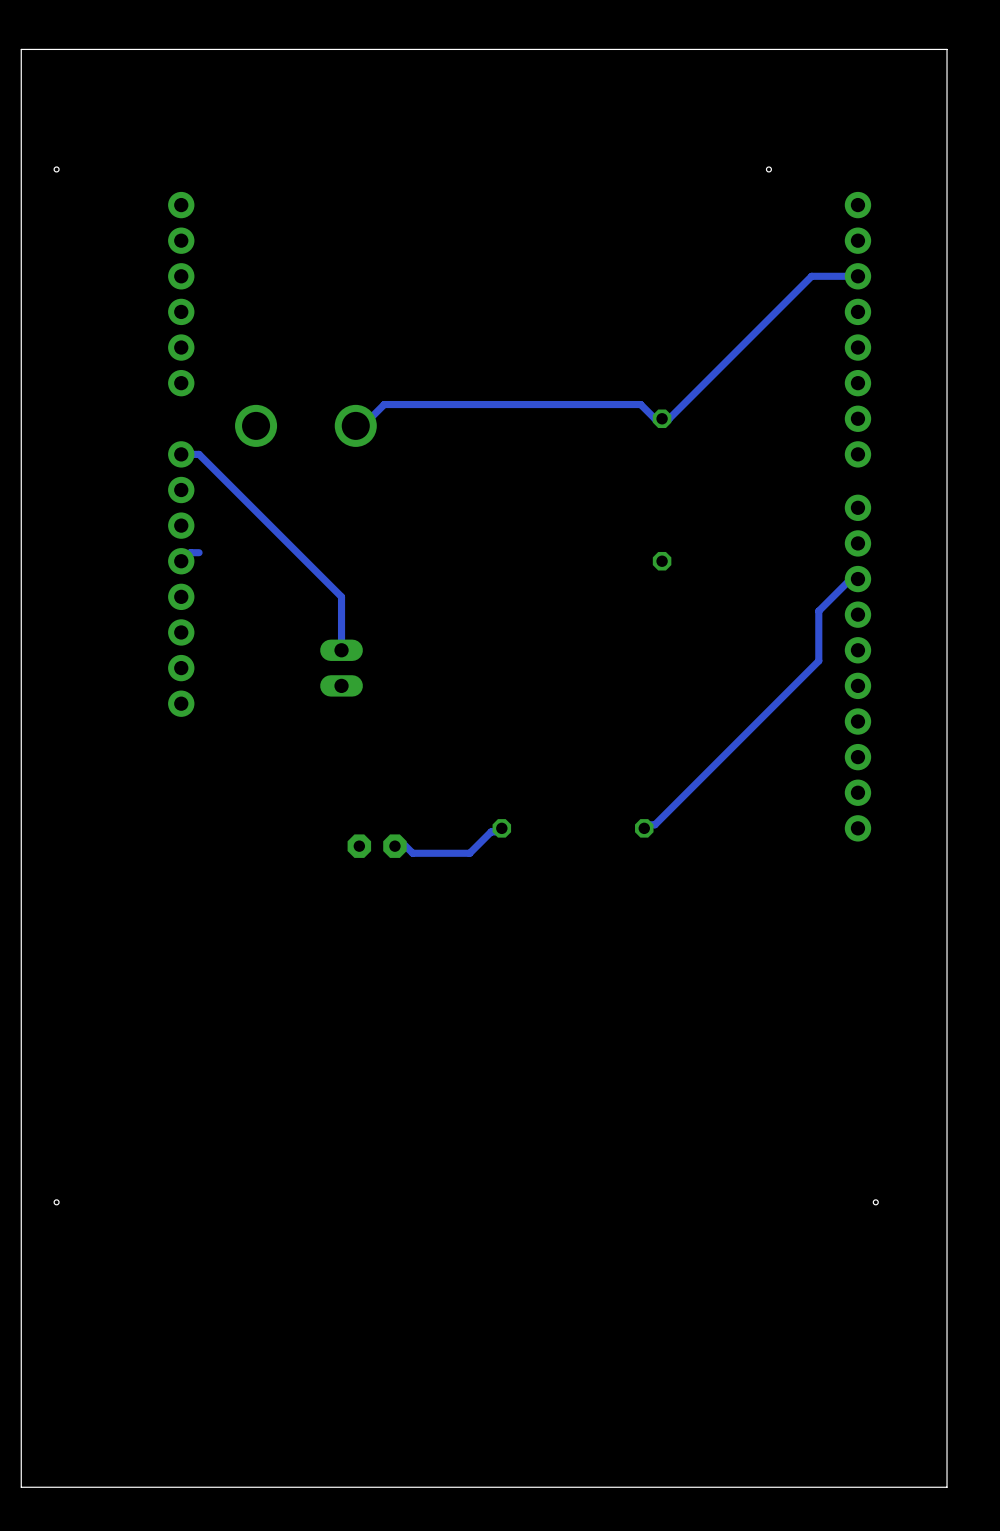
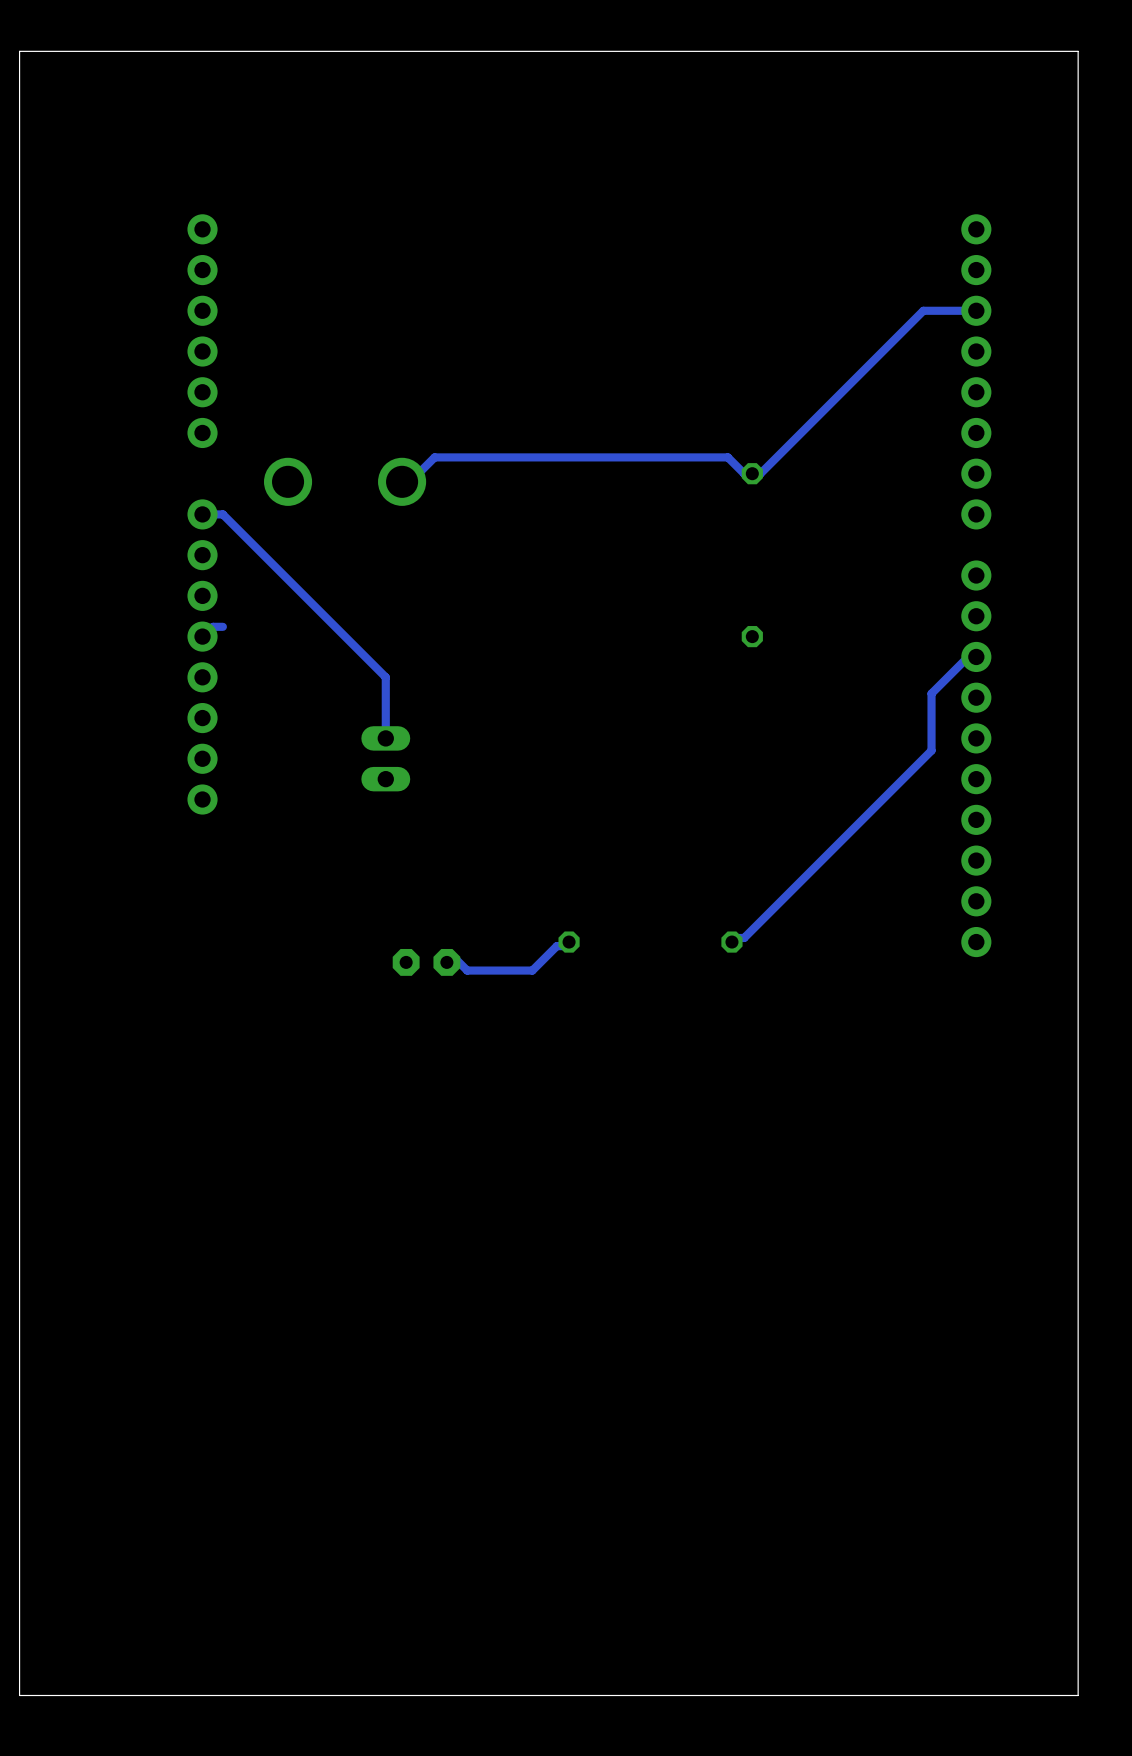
hole: (56, 169) -> none
hole: (768, 169) -> none
hole: (56, 1202) -> none
hole: (875, 1202) -> none

